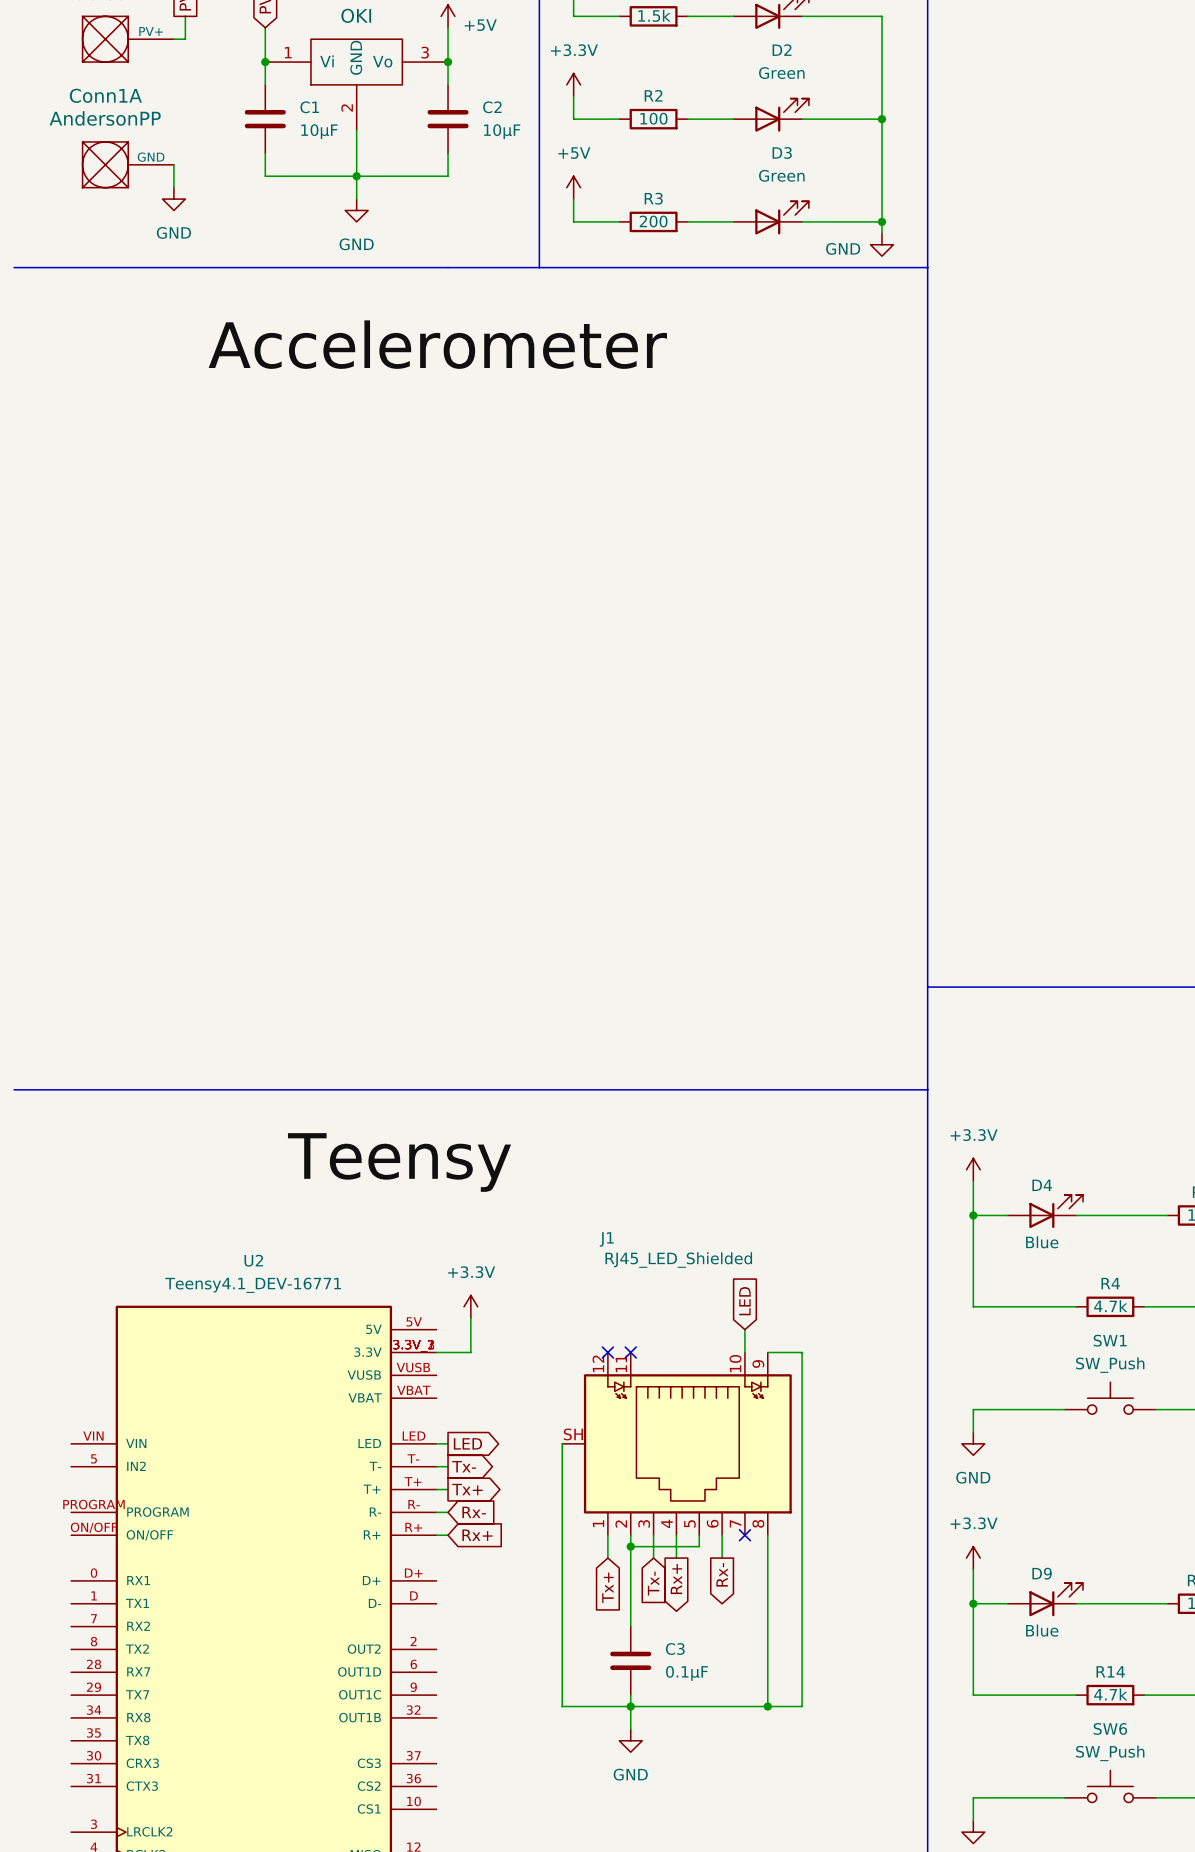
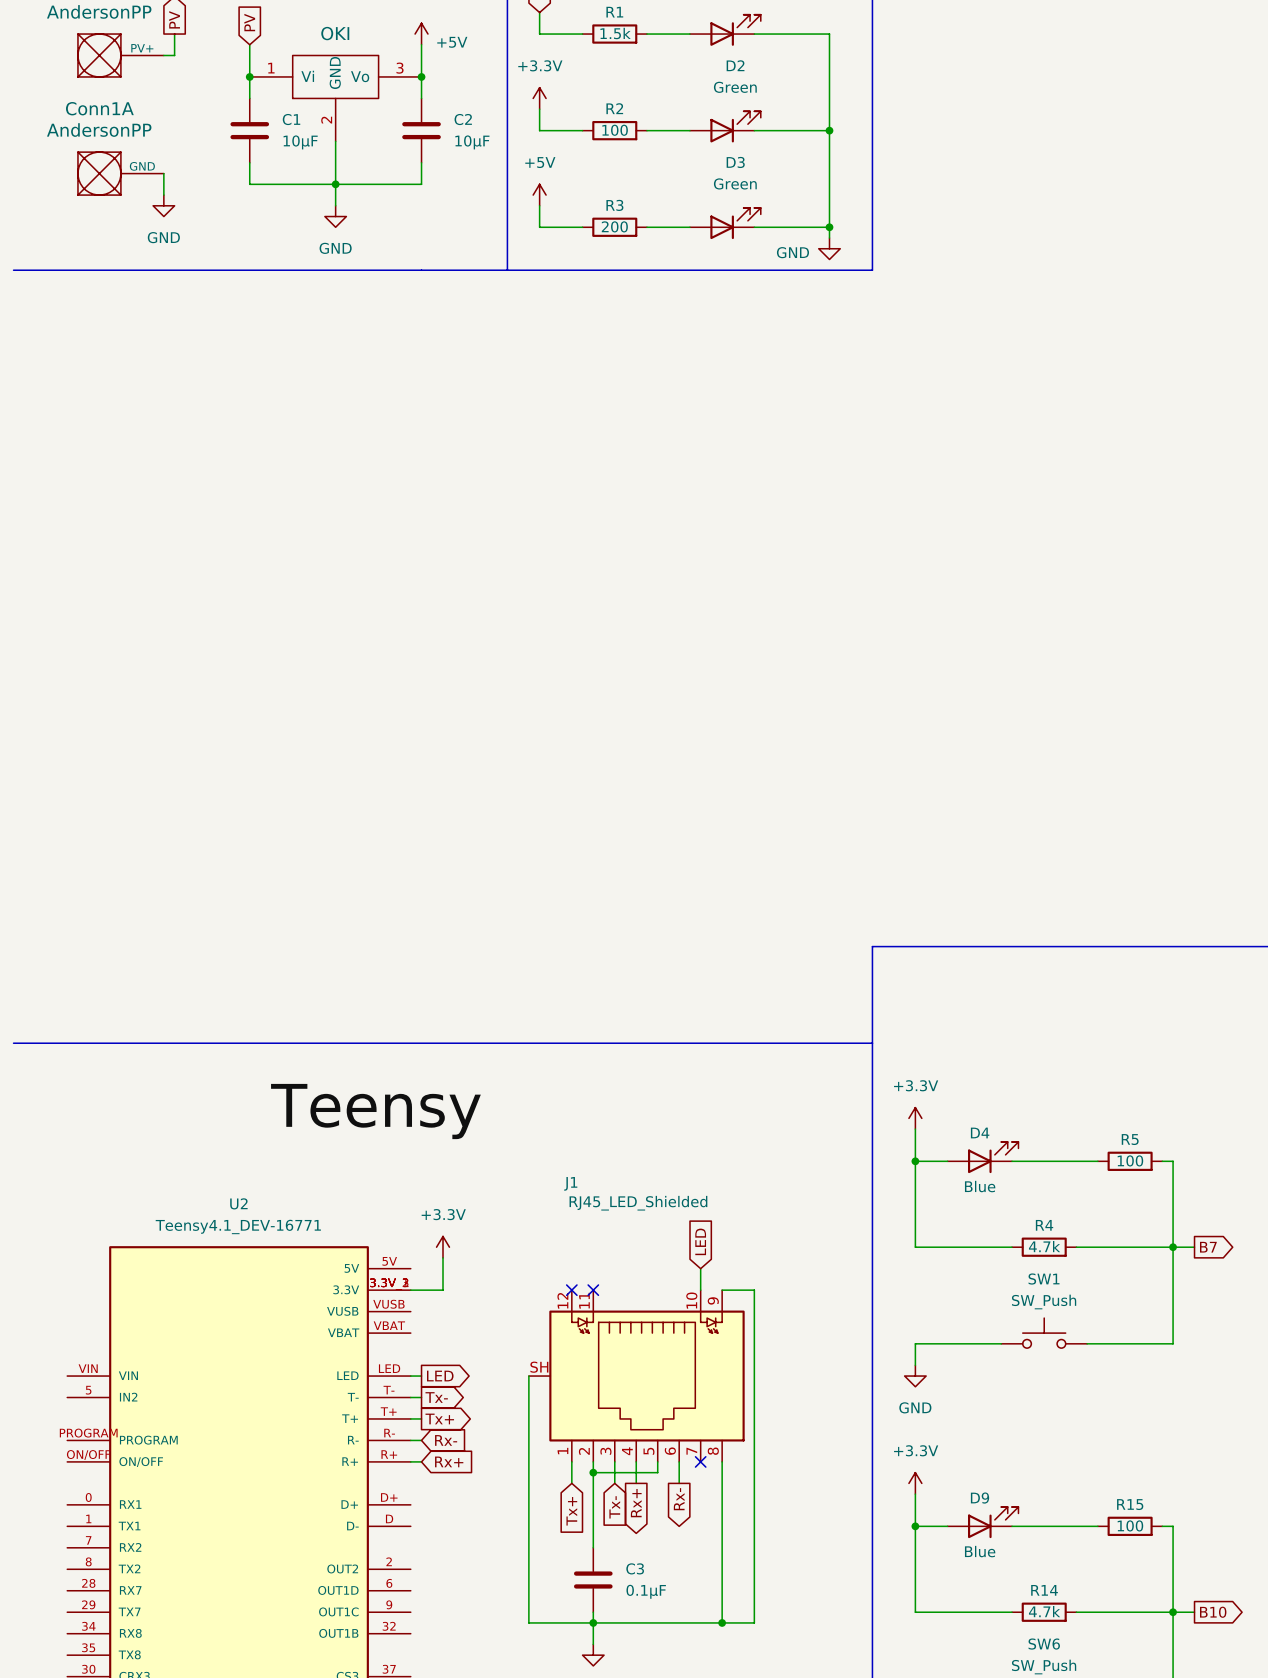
line: (927, 267) (927, 987) -> none
label: Accelerometer (437, 344) -> none

